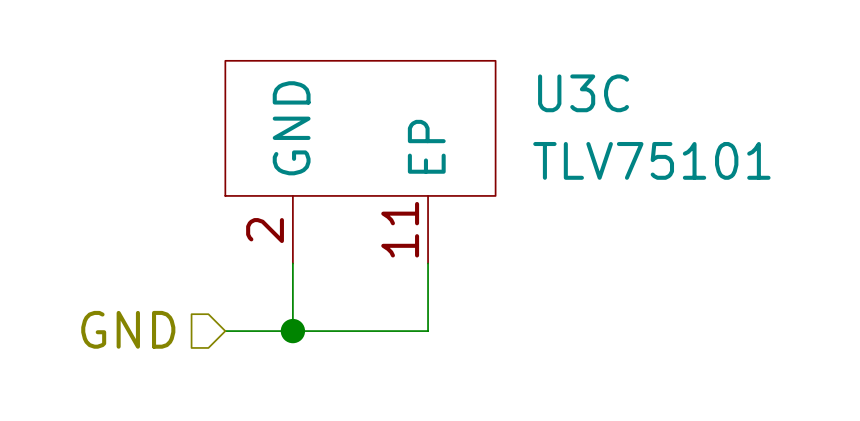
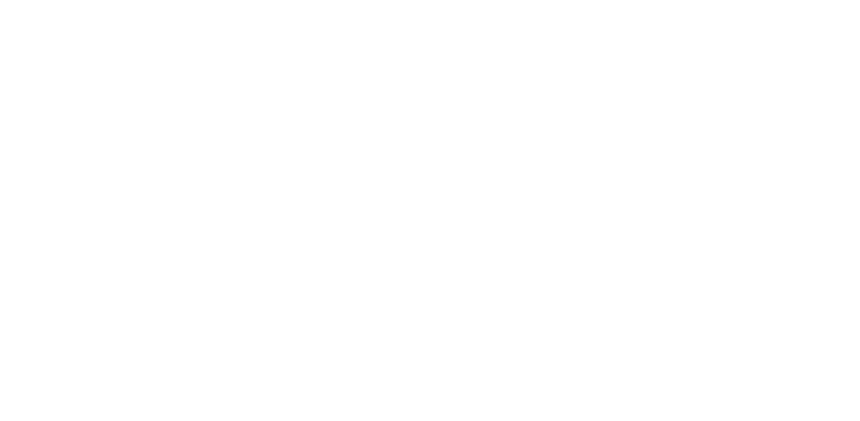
U3C: TLV75101 (360, 162) -> none
wire: (292, 263) (292, 331) -> none
wire: (428, 263) (428, 331) (225, 331) -> none
hierarchical label: GND (128, 329) -> none
junction: (292, 331) -> none

